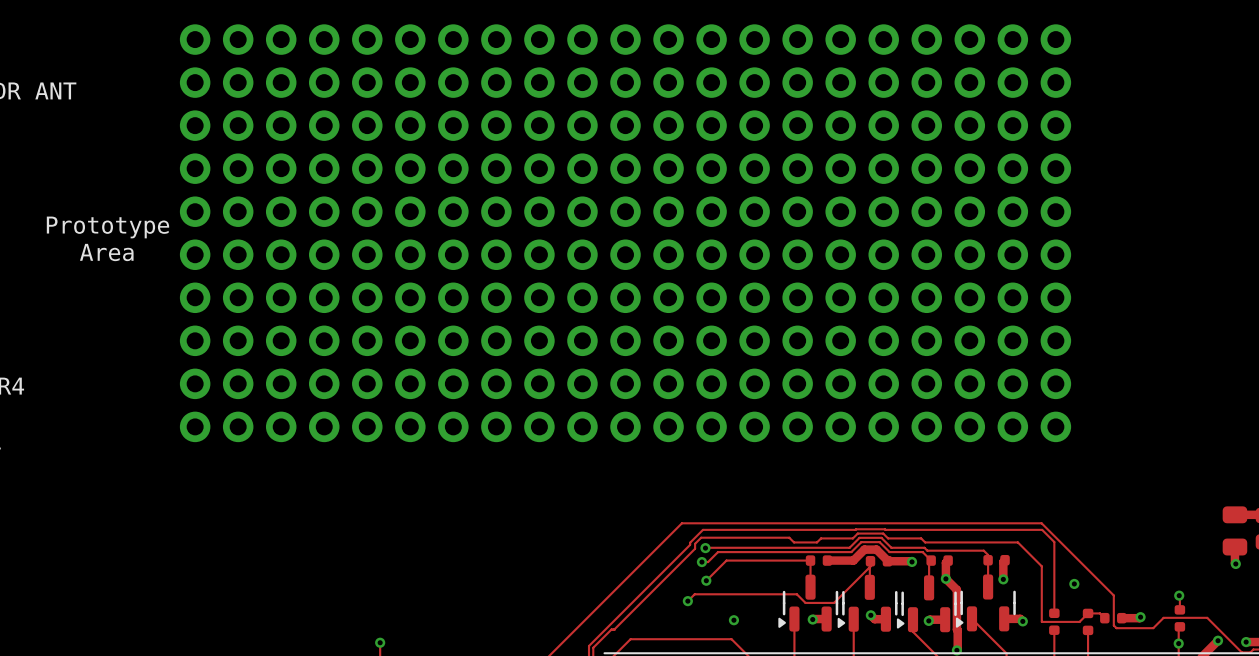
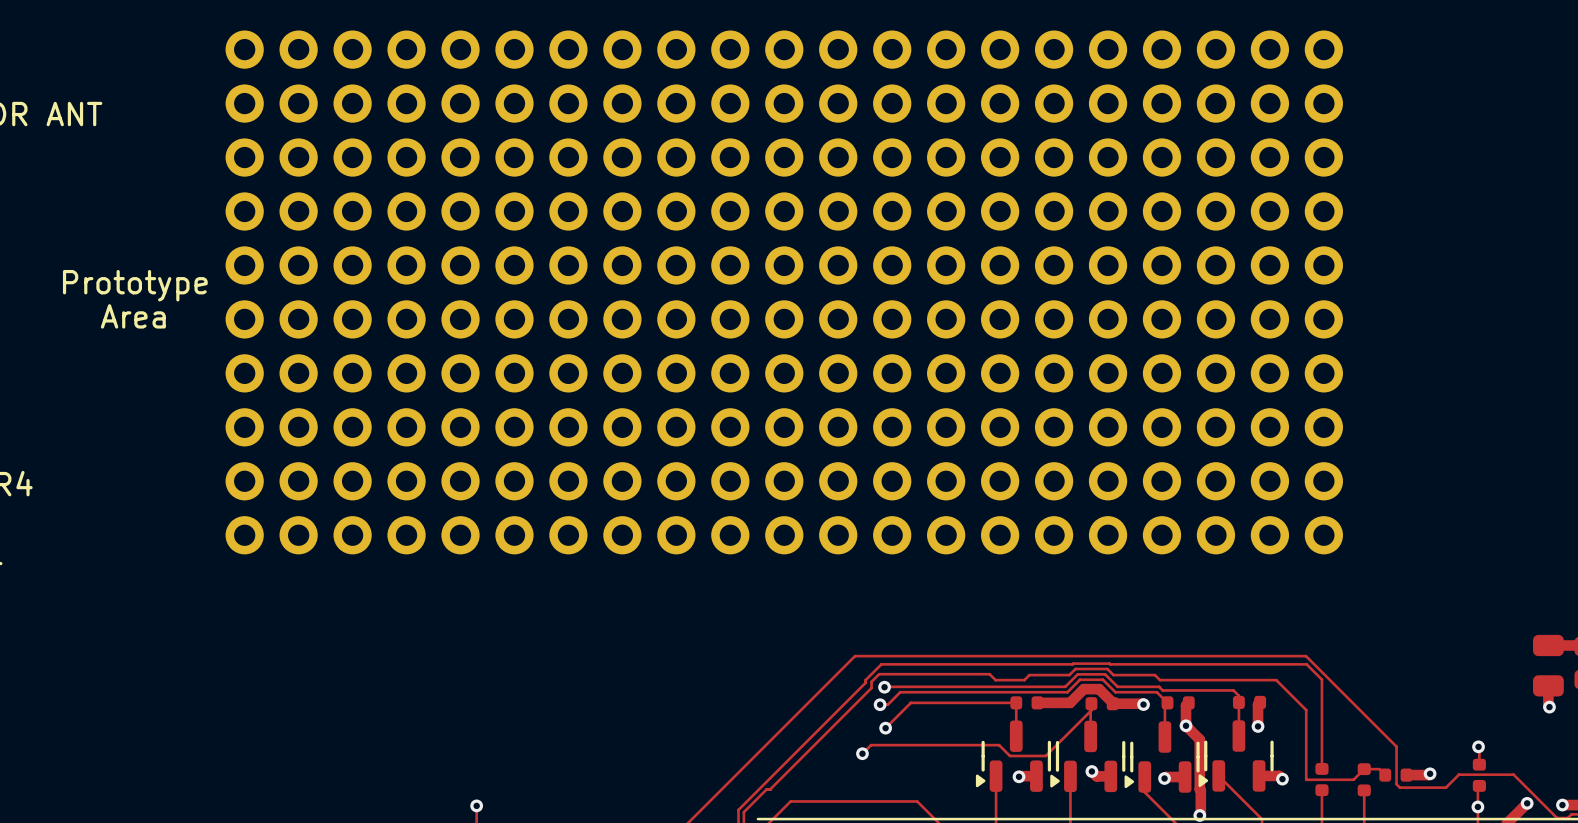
via: (1074, 583) -> none
via: (733, 620) -> none

